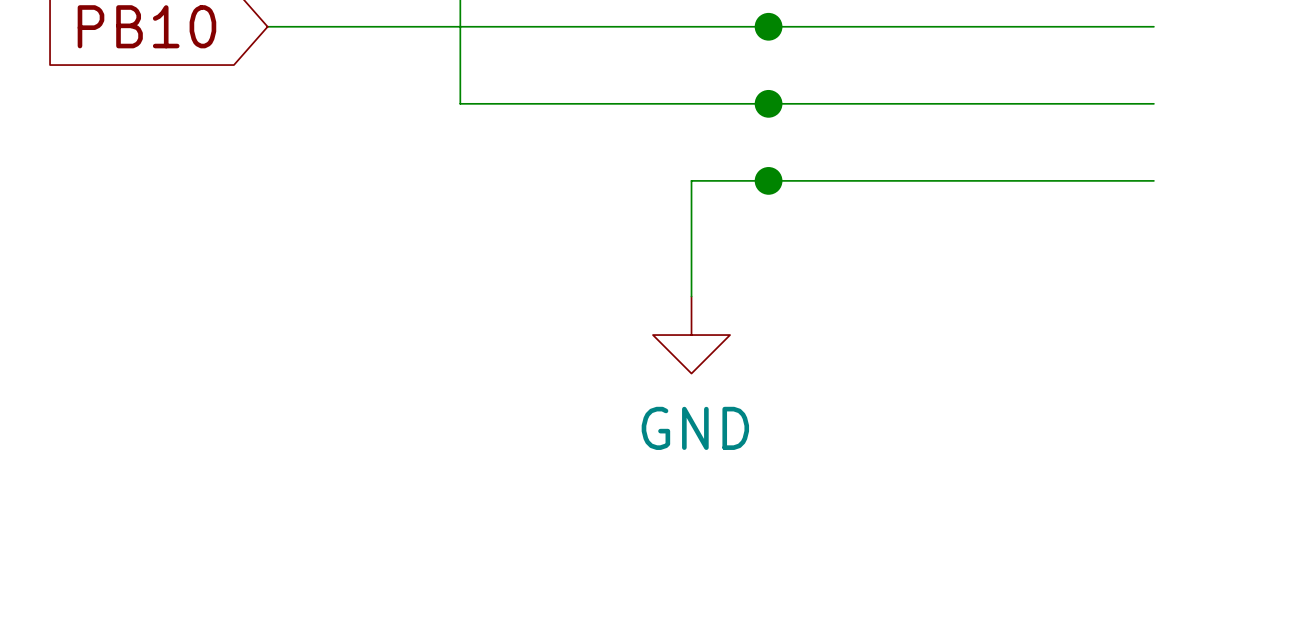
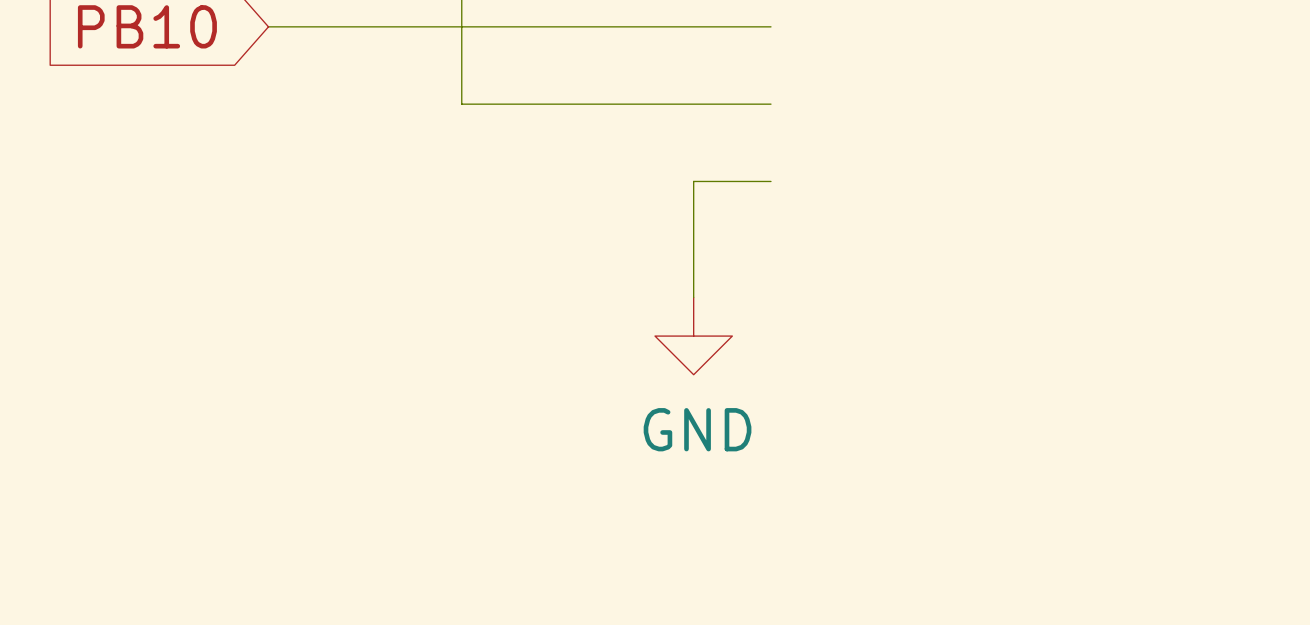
wire: (768, 26) (1153, 26) -> none
junction: (768, 26) -> none
wire: (768, 103) (1153, 103) -> none
junction: (768, 103) -> none
wire: (768, 180) (1153, 180) -> none
junction: (768, 180) -> none

